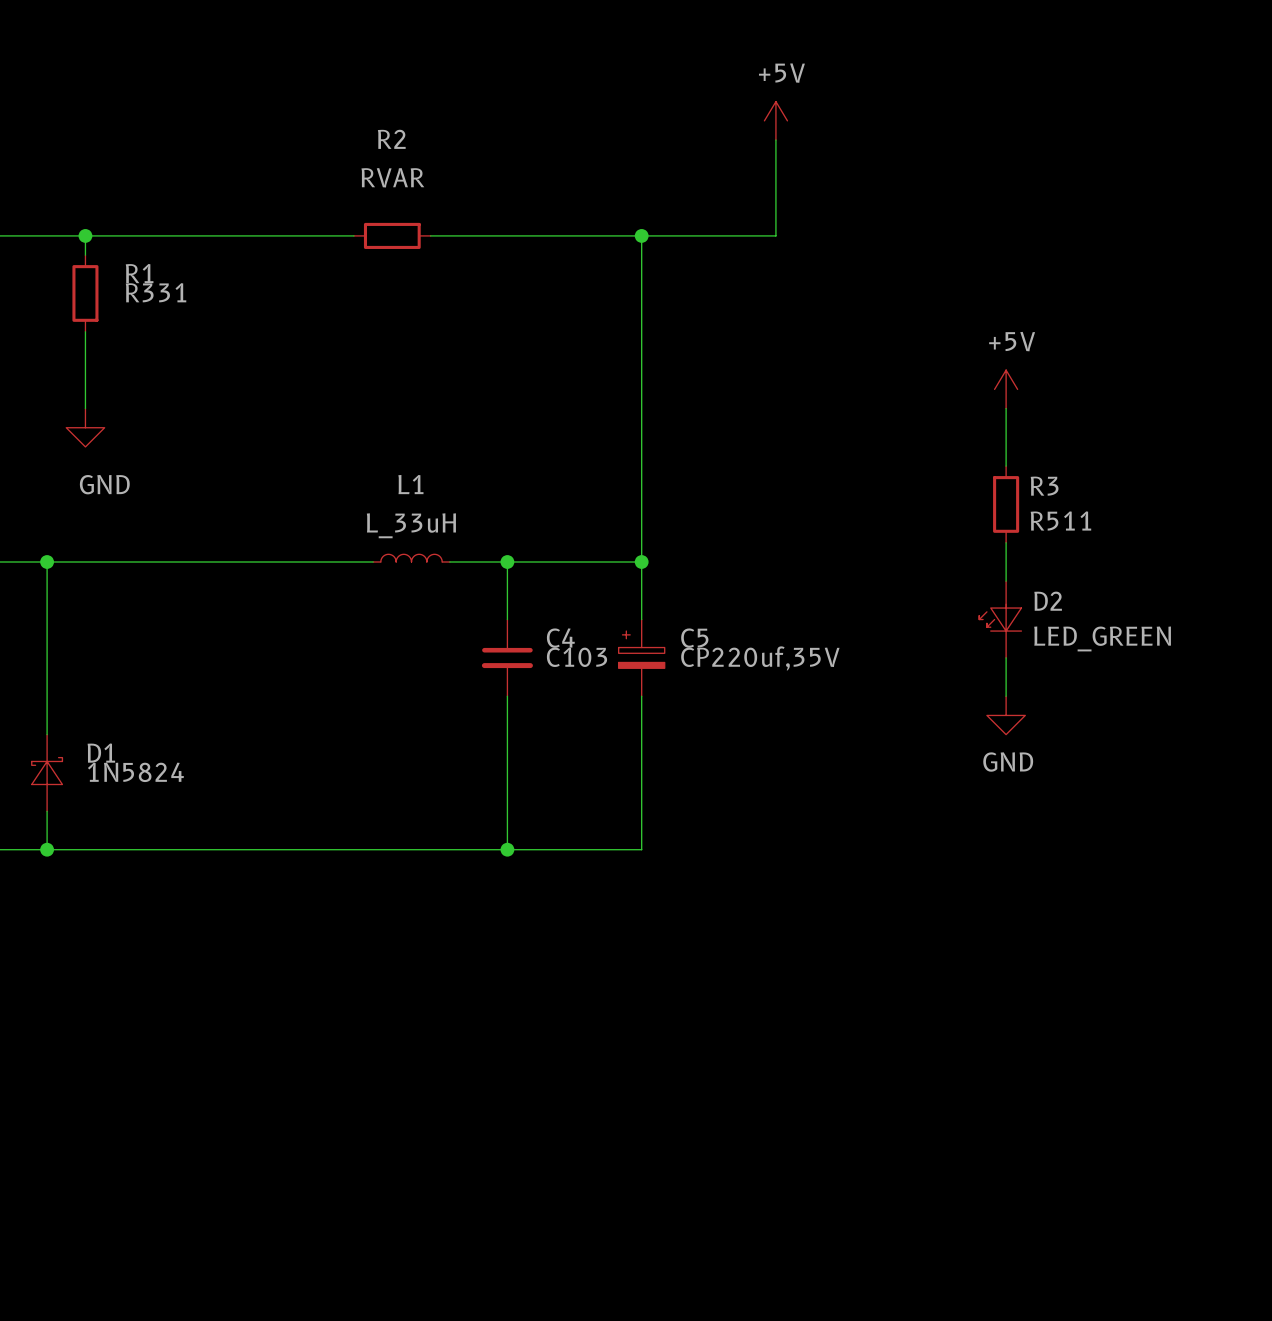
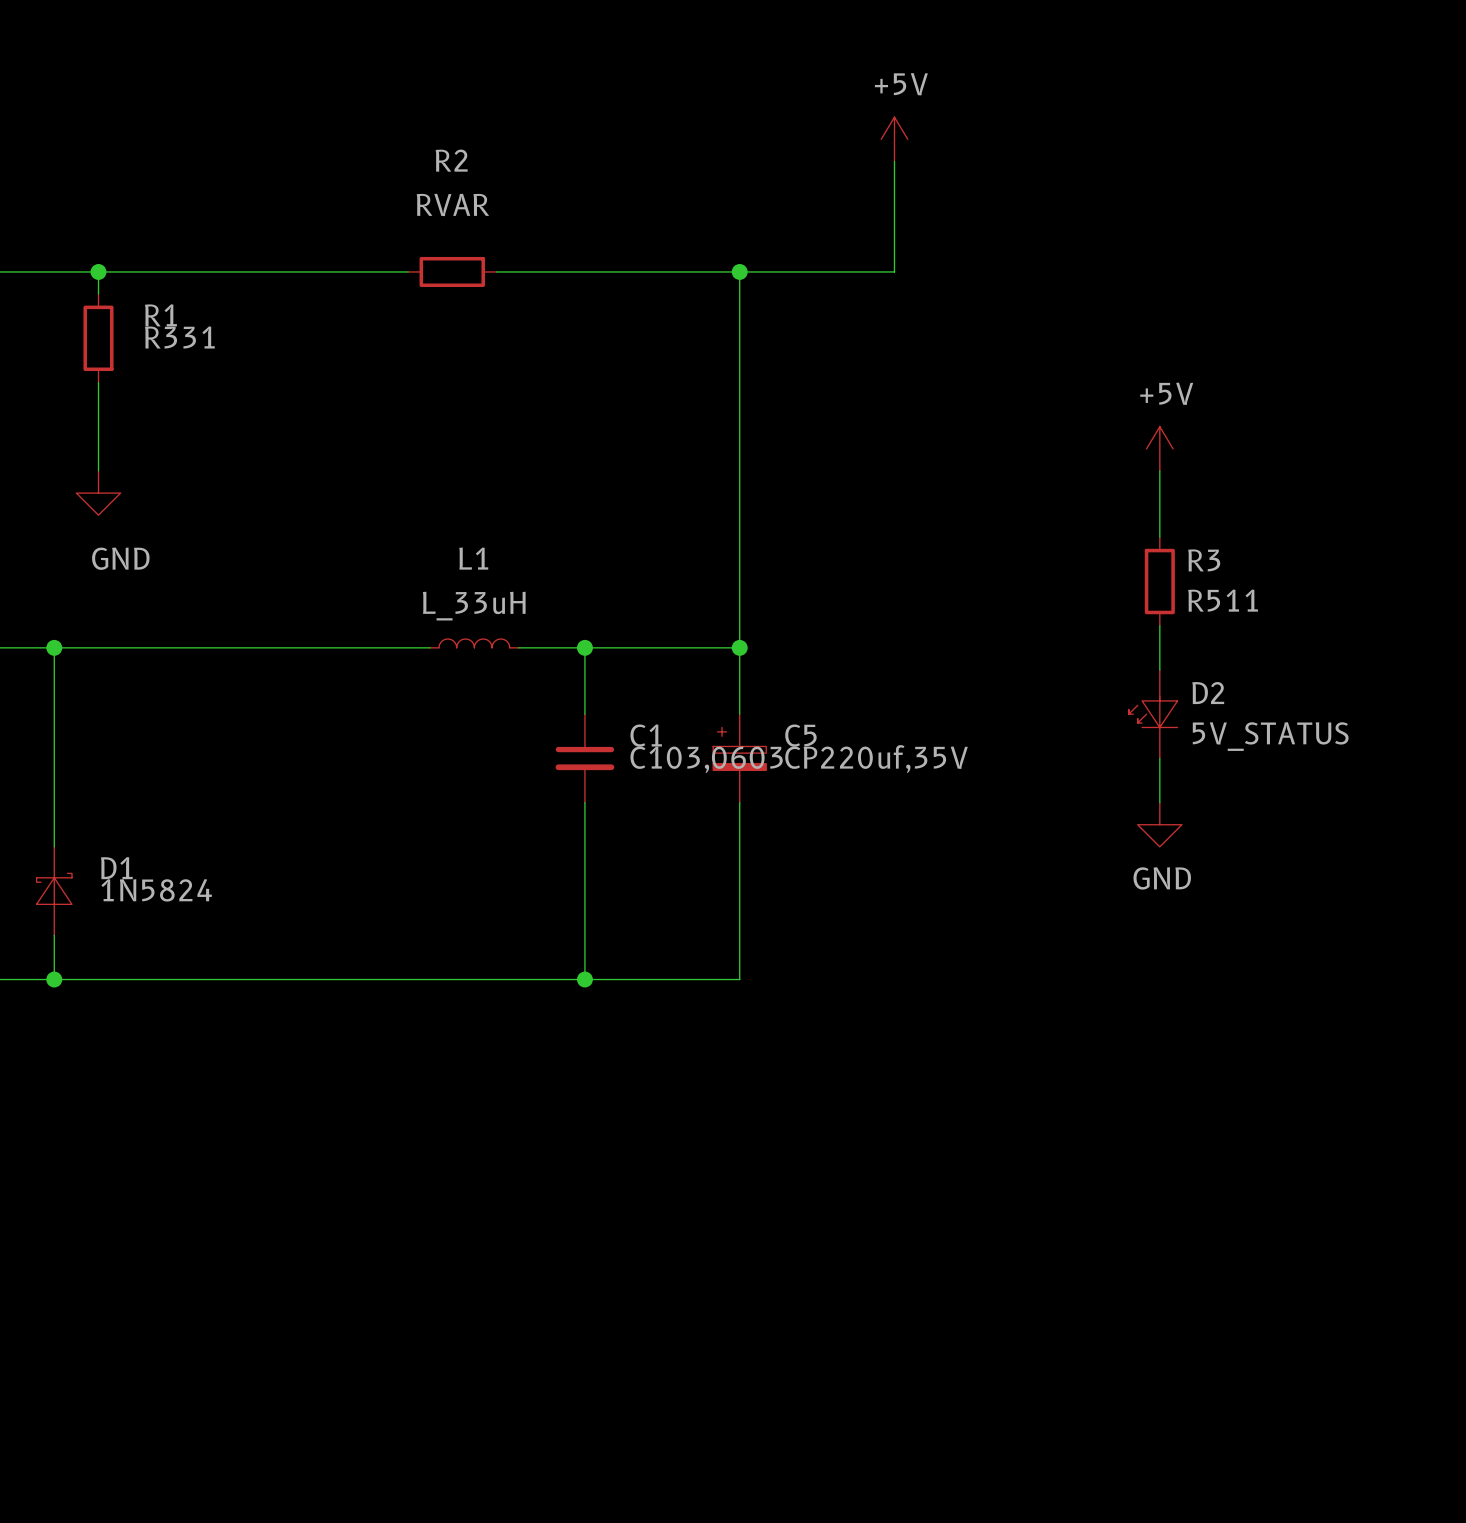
C4 name: C4 (560, 638) -> C1 (646, 735)
D2 value: LED_GREEN (1102, 638) -> 5V_STATUS (1270, 736)
C4 value: C103 (576, 657) -> C103,0603 (706, 759)

